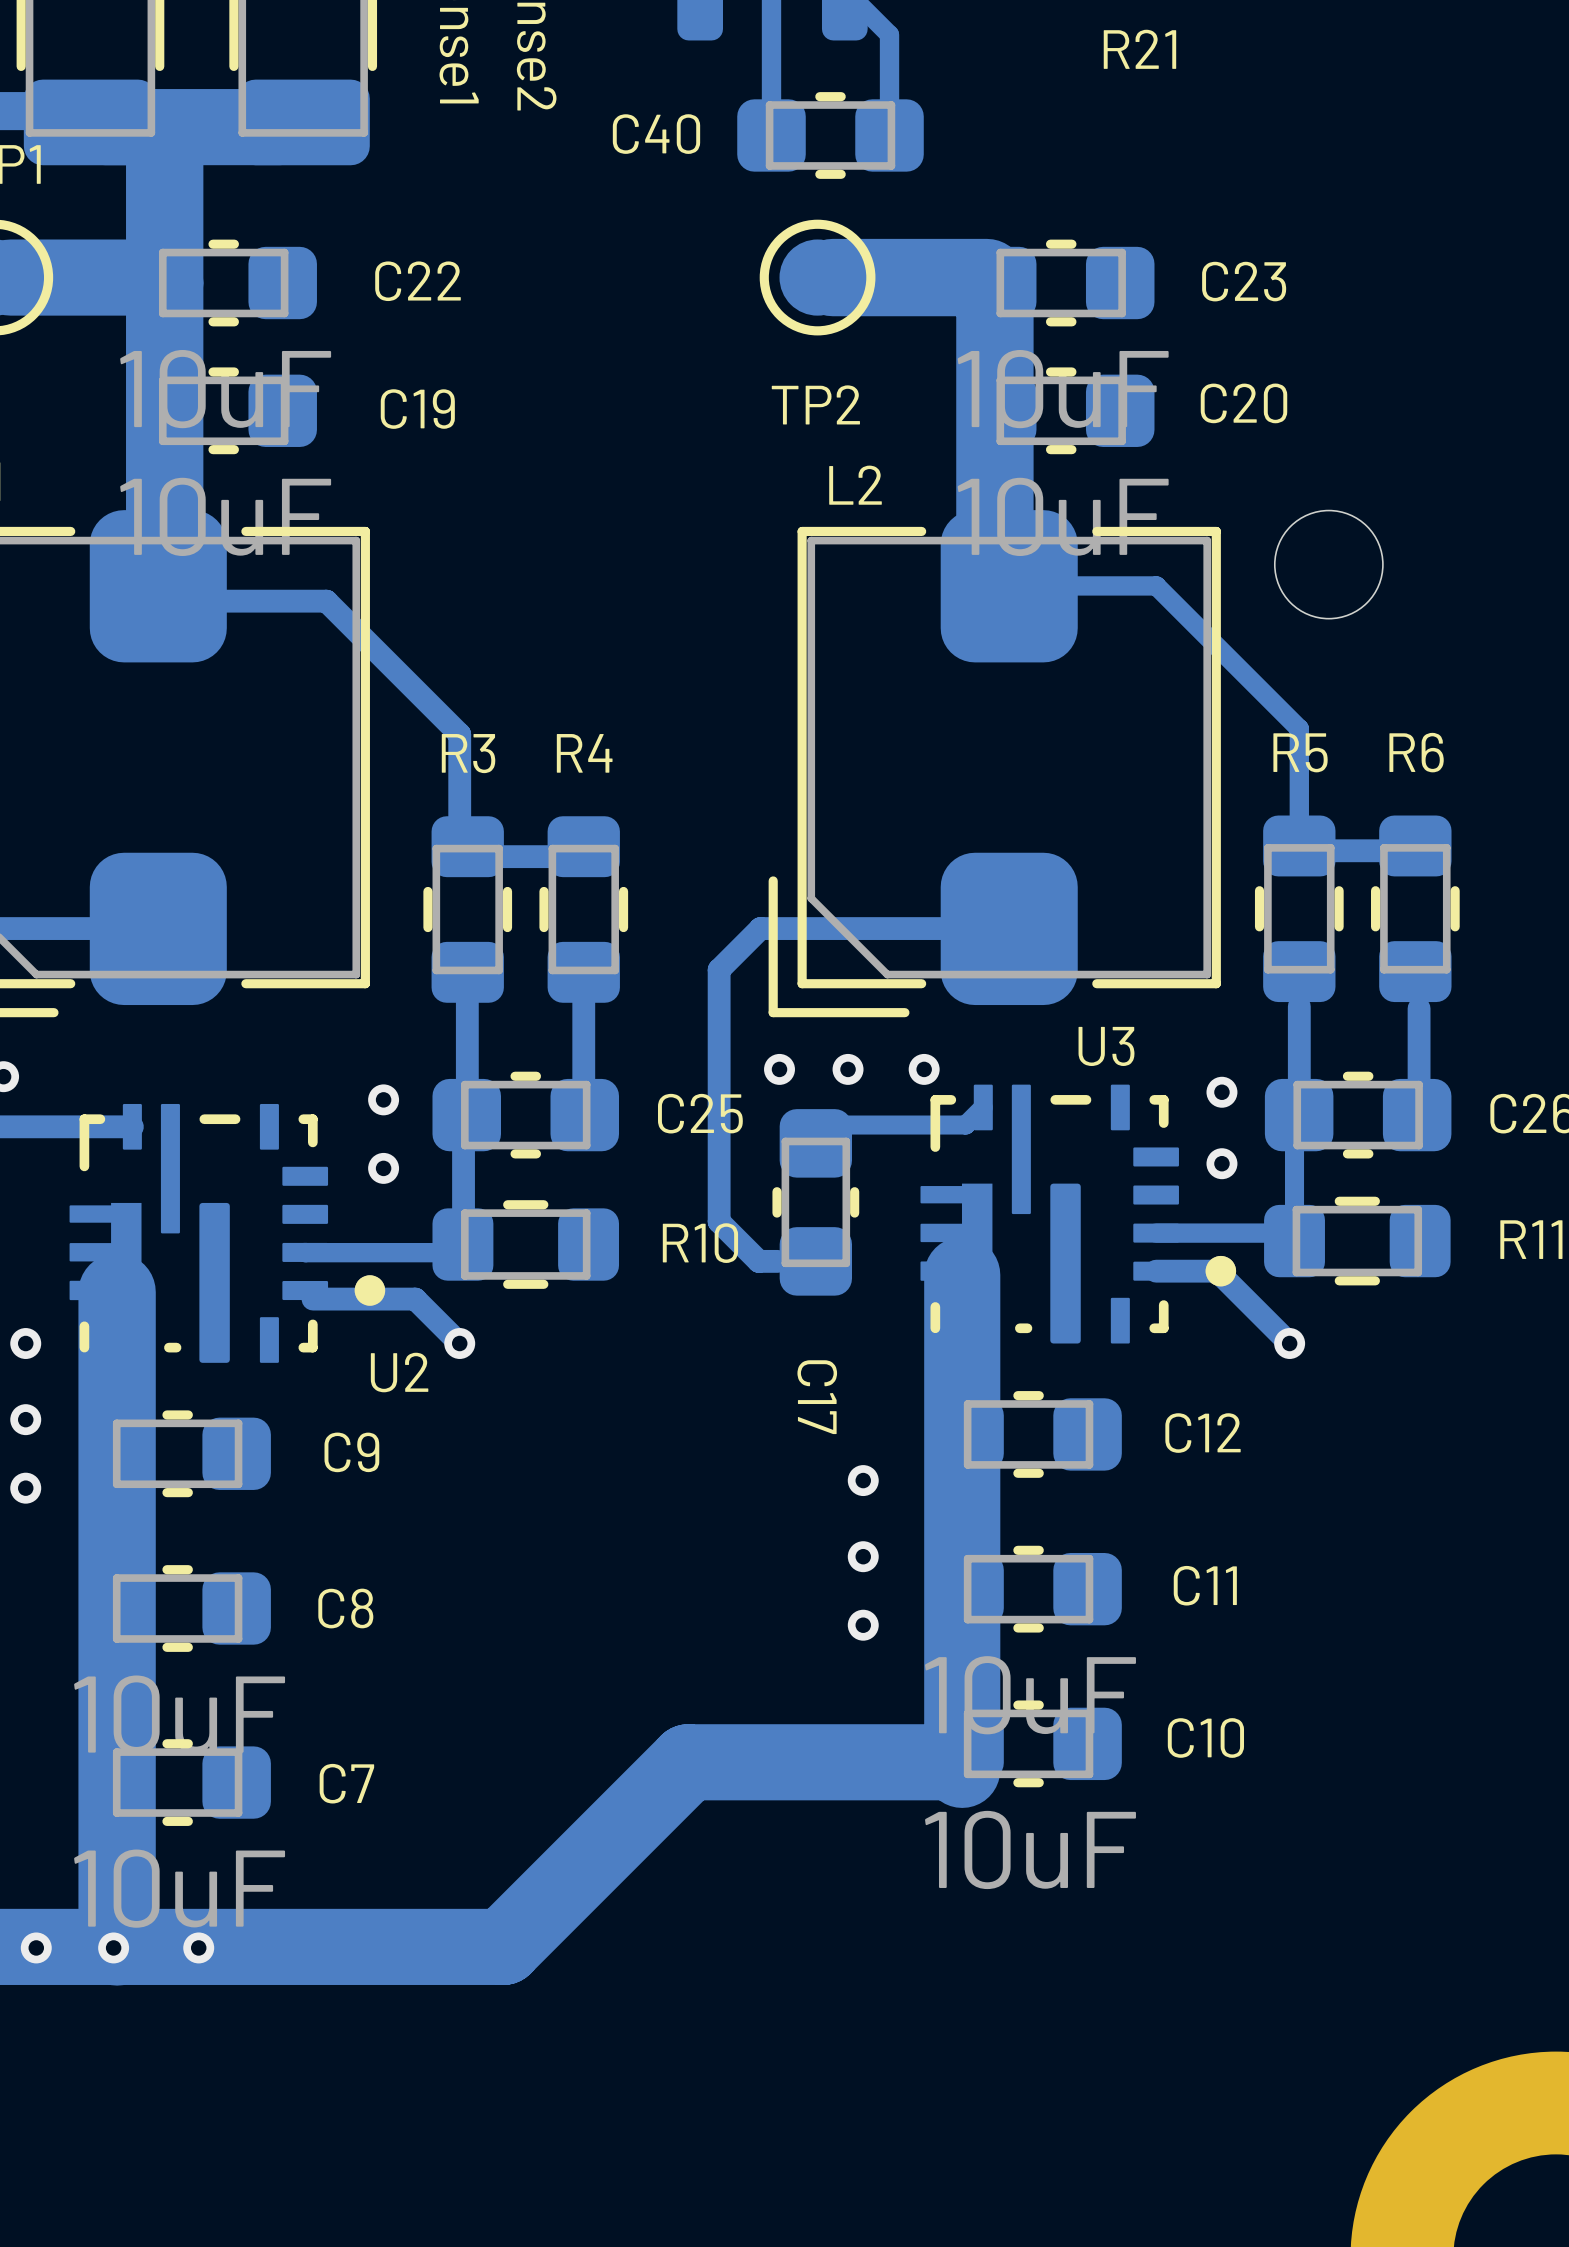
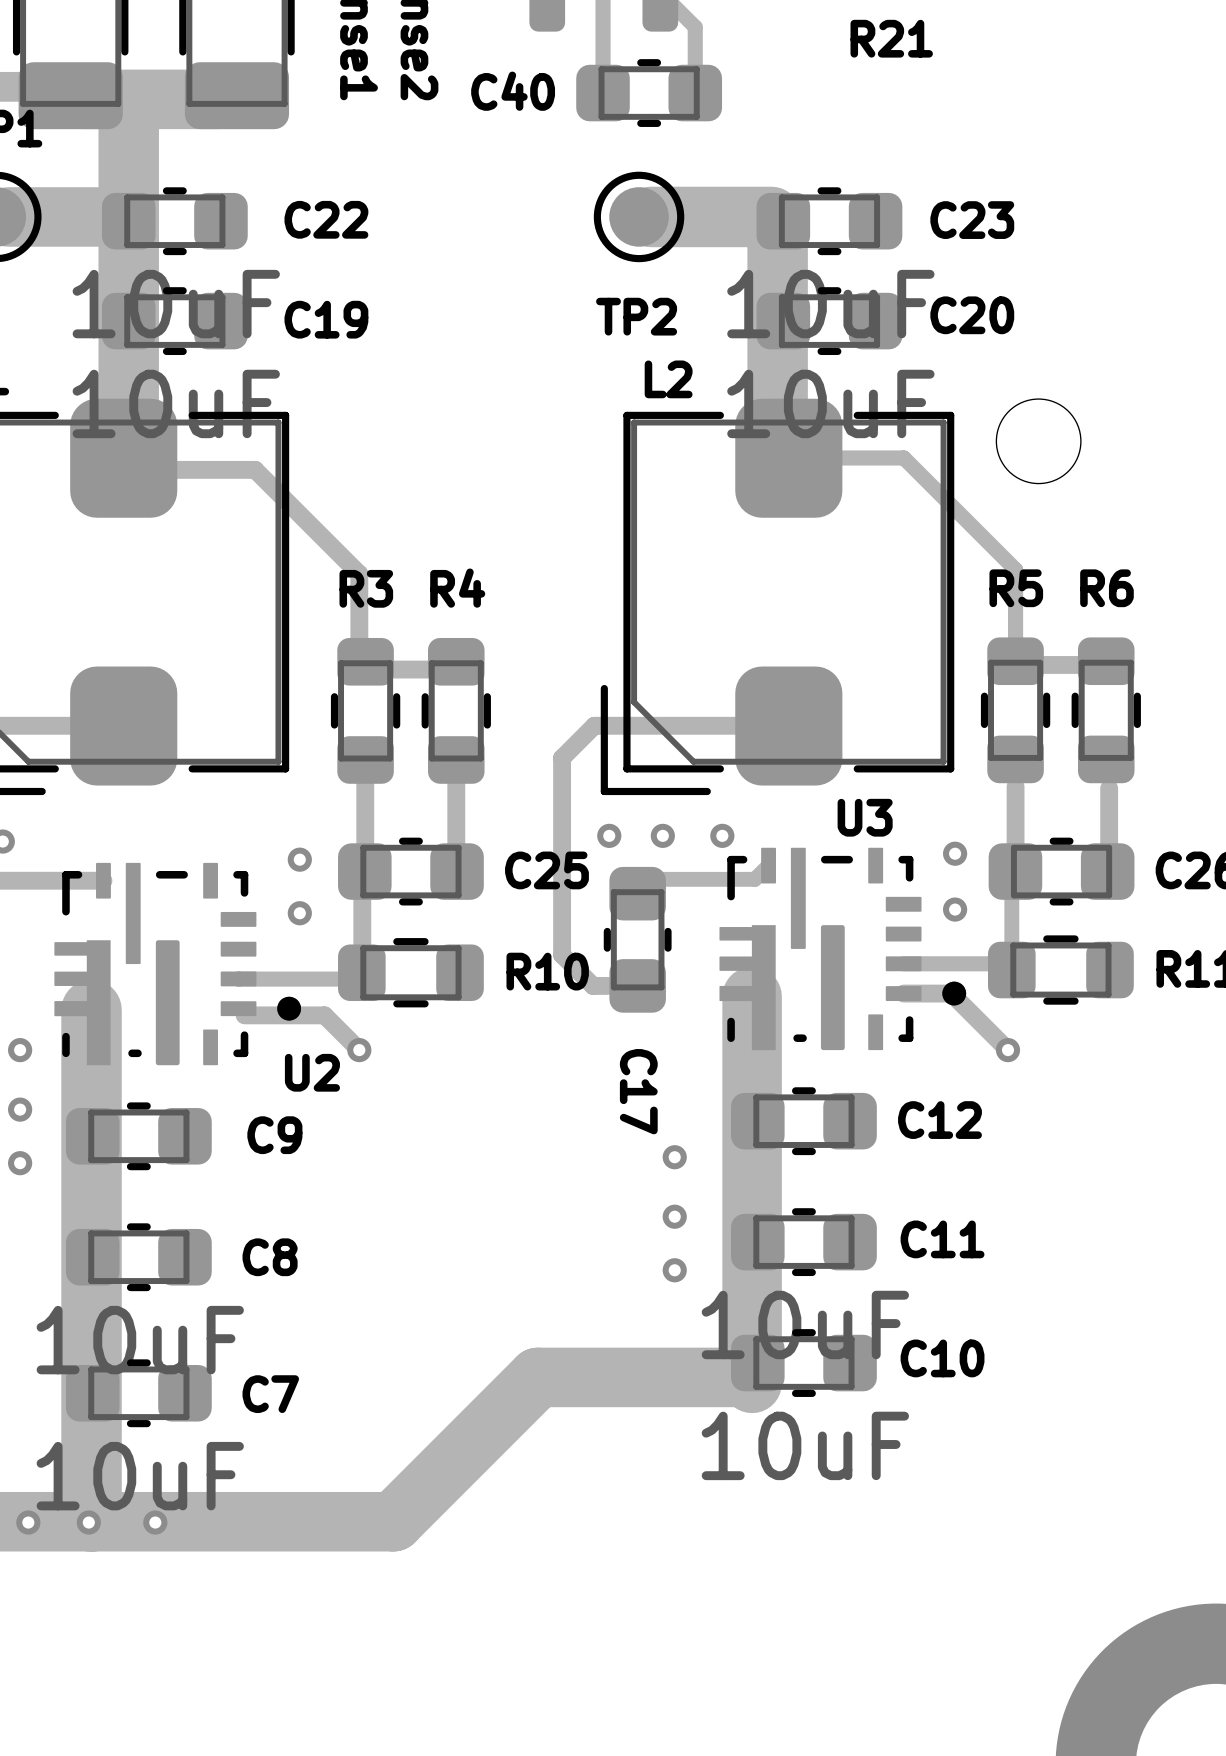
C40 position: (830, 135) -> (649, 93)

